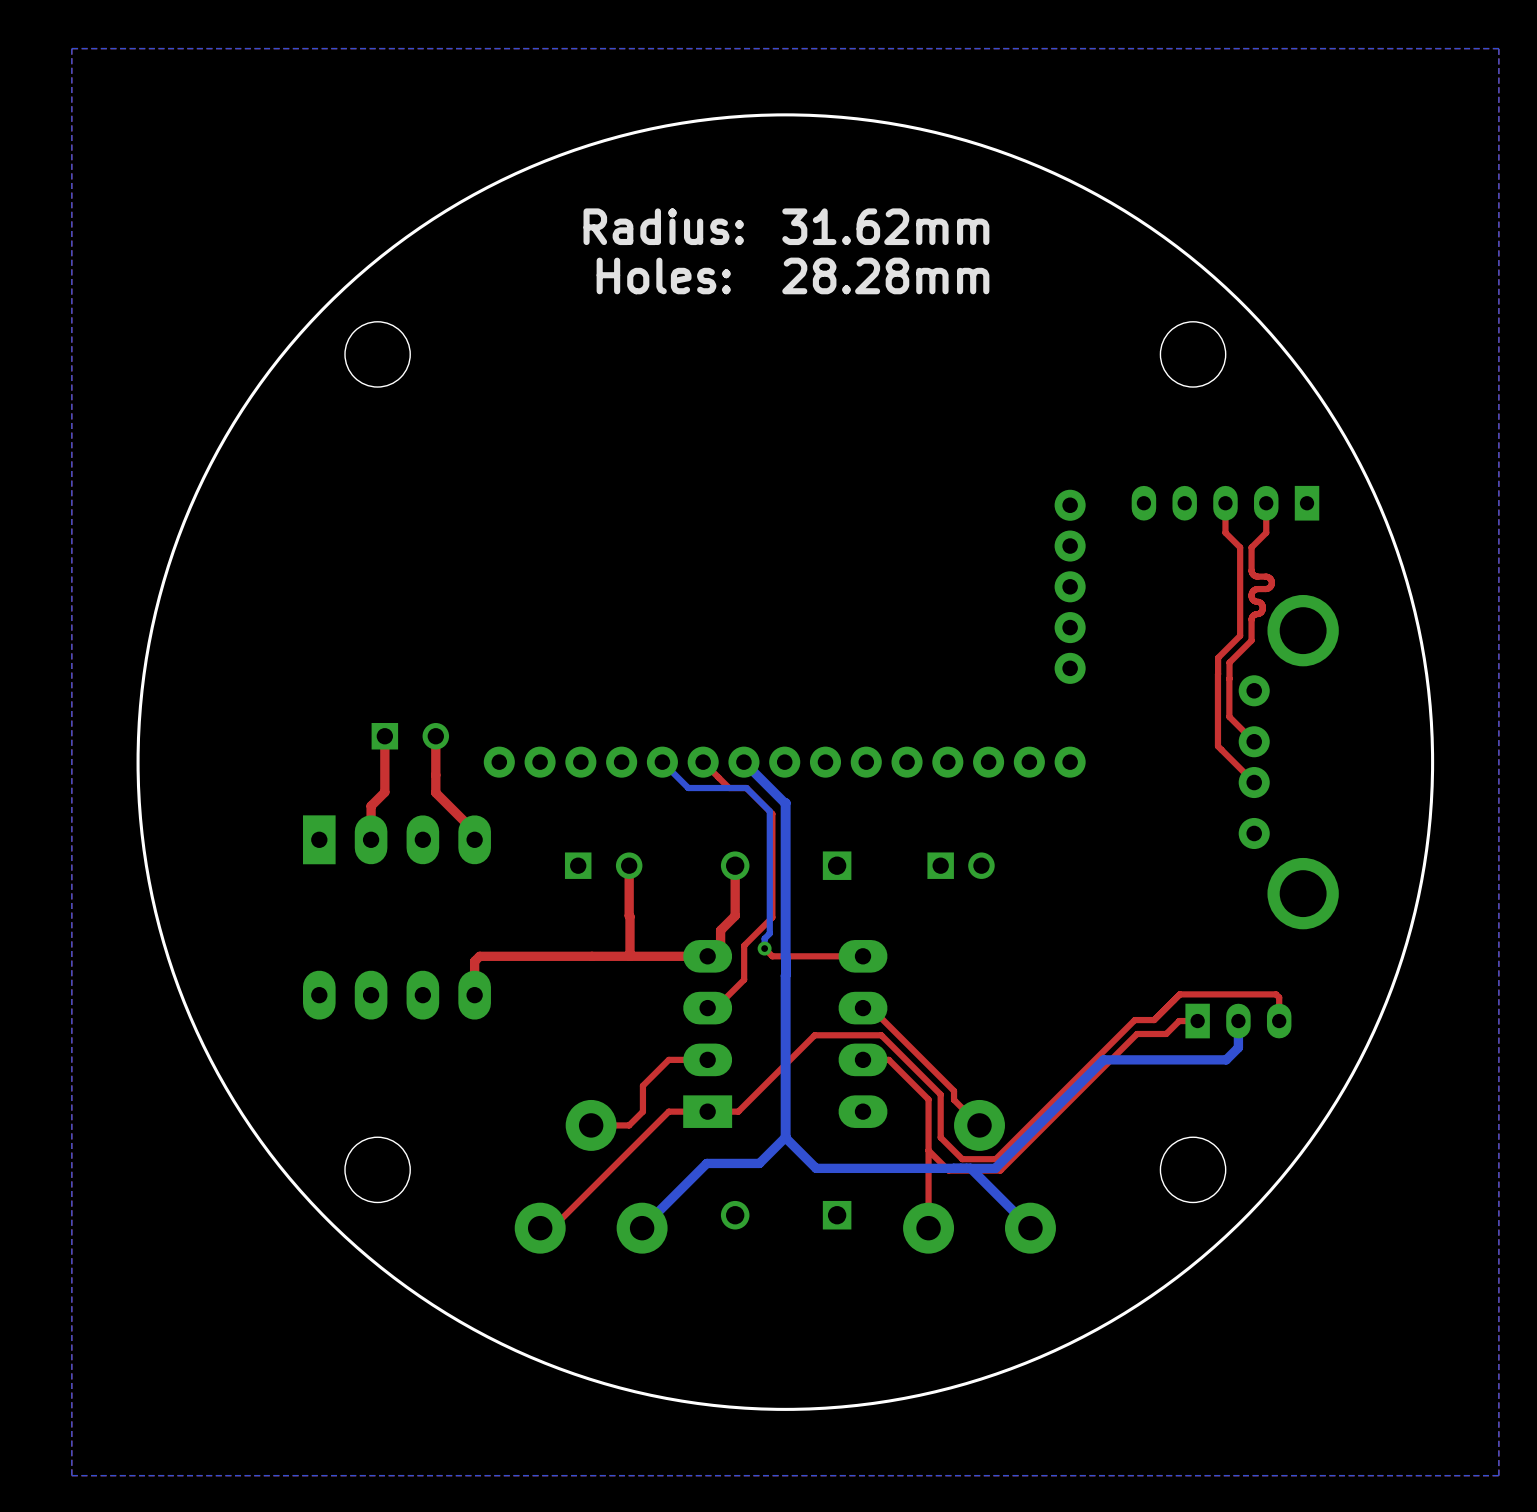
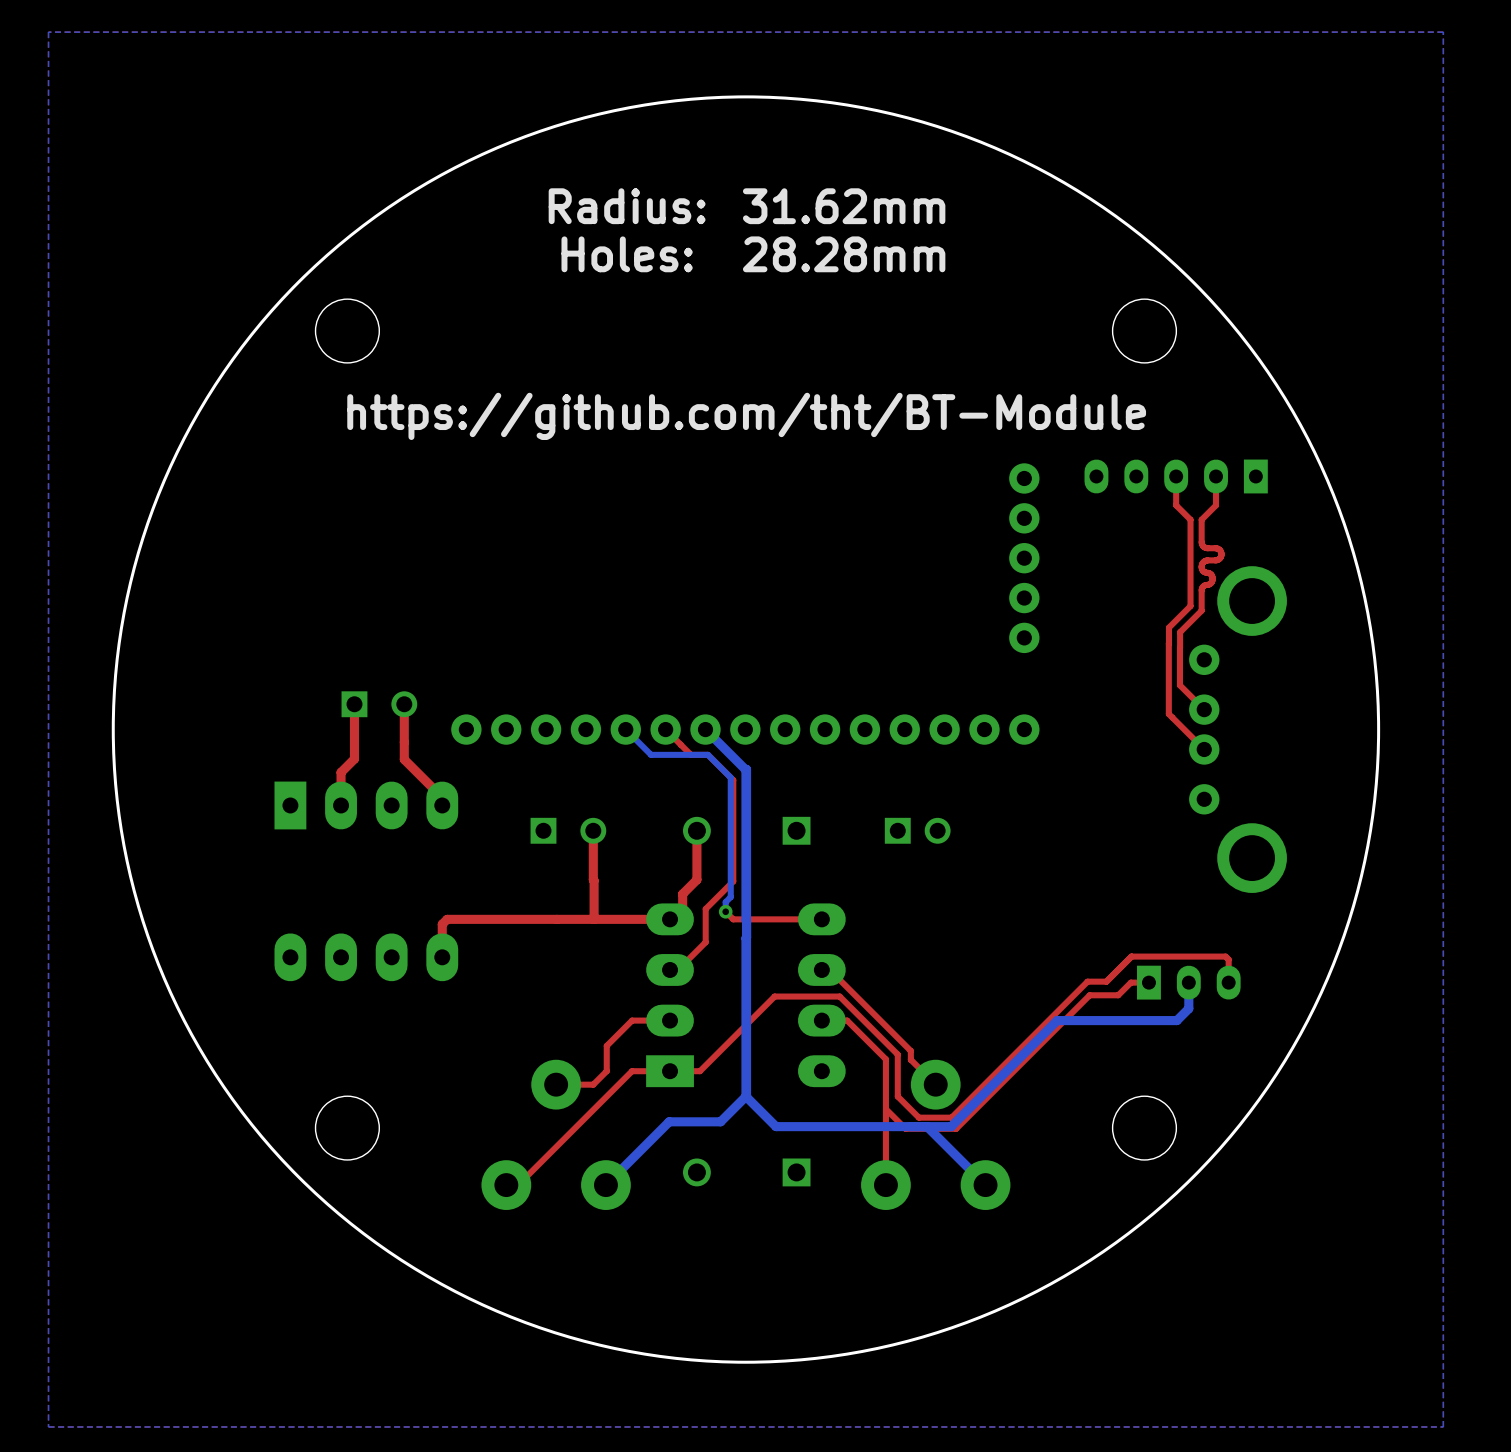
text: none -> https://github.com/tht/BT-Module (746, 416)

